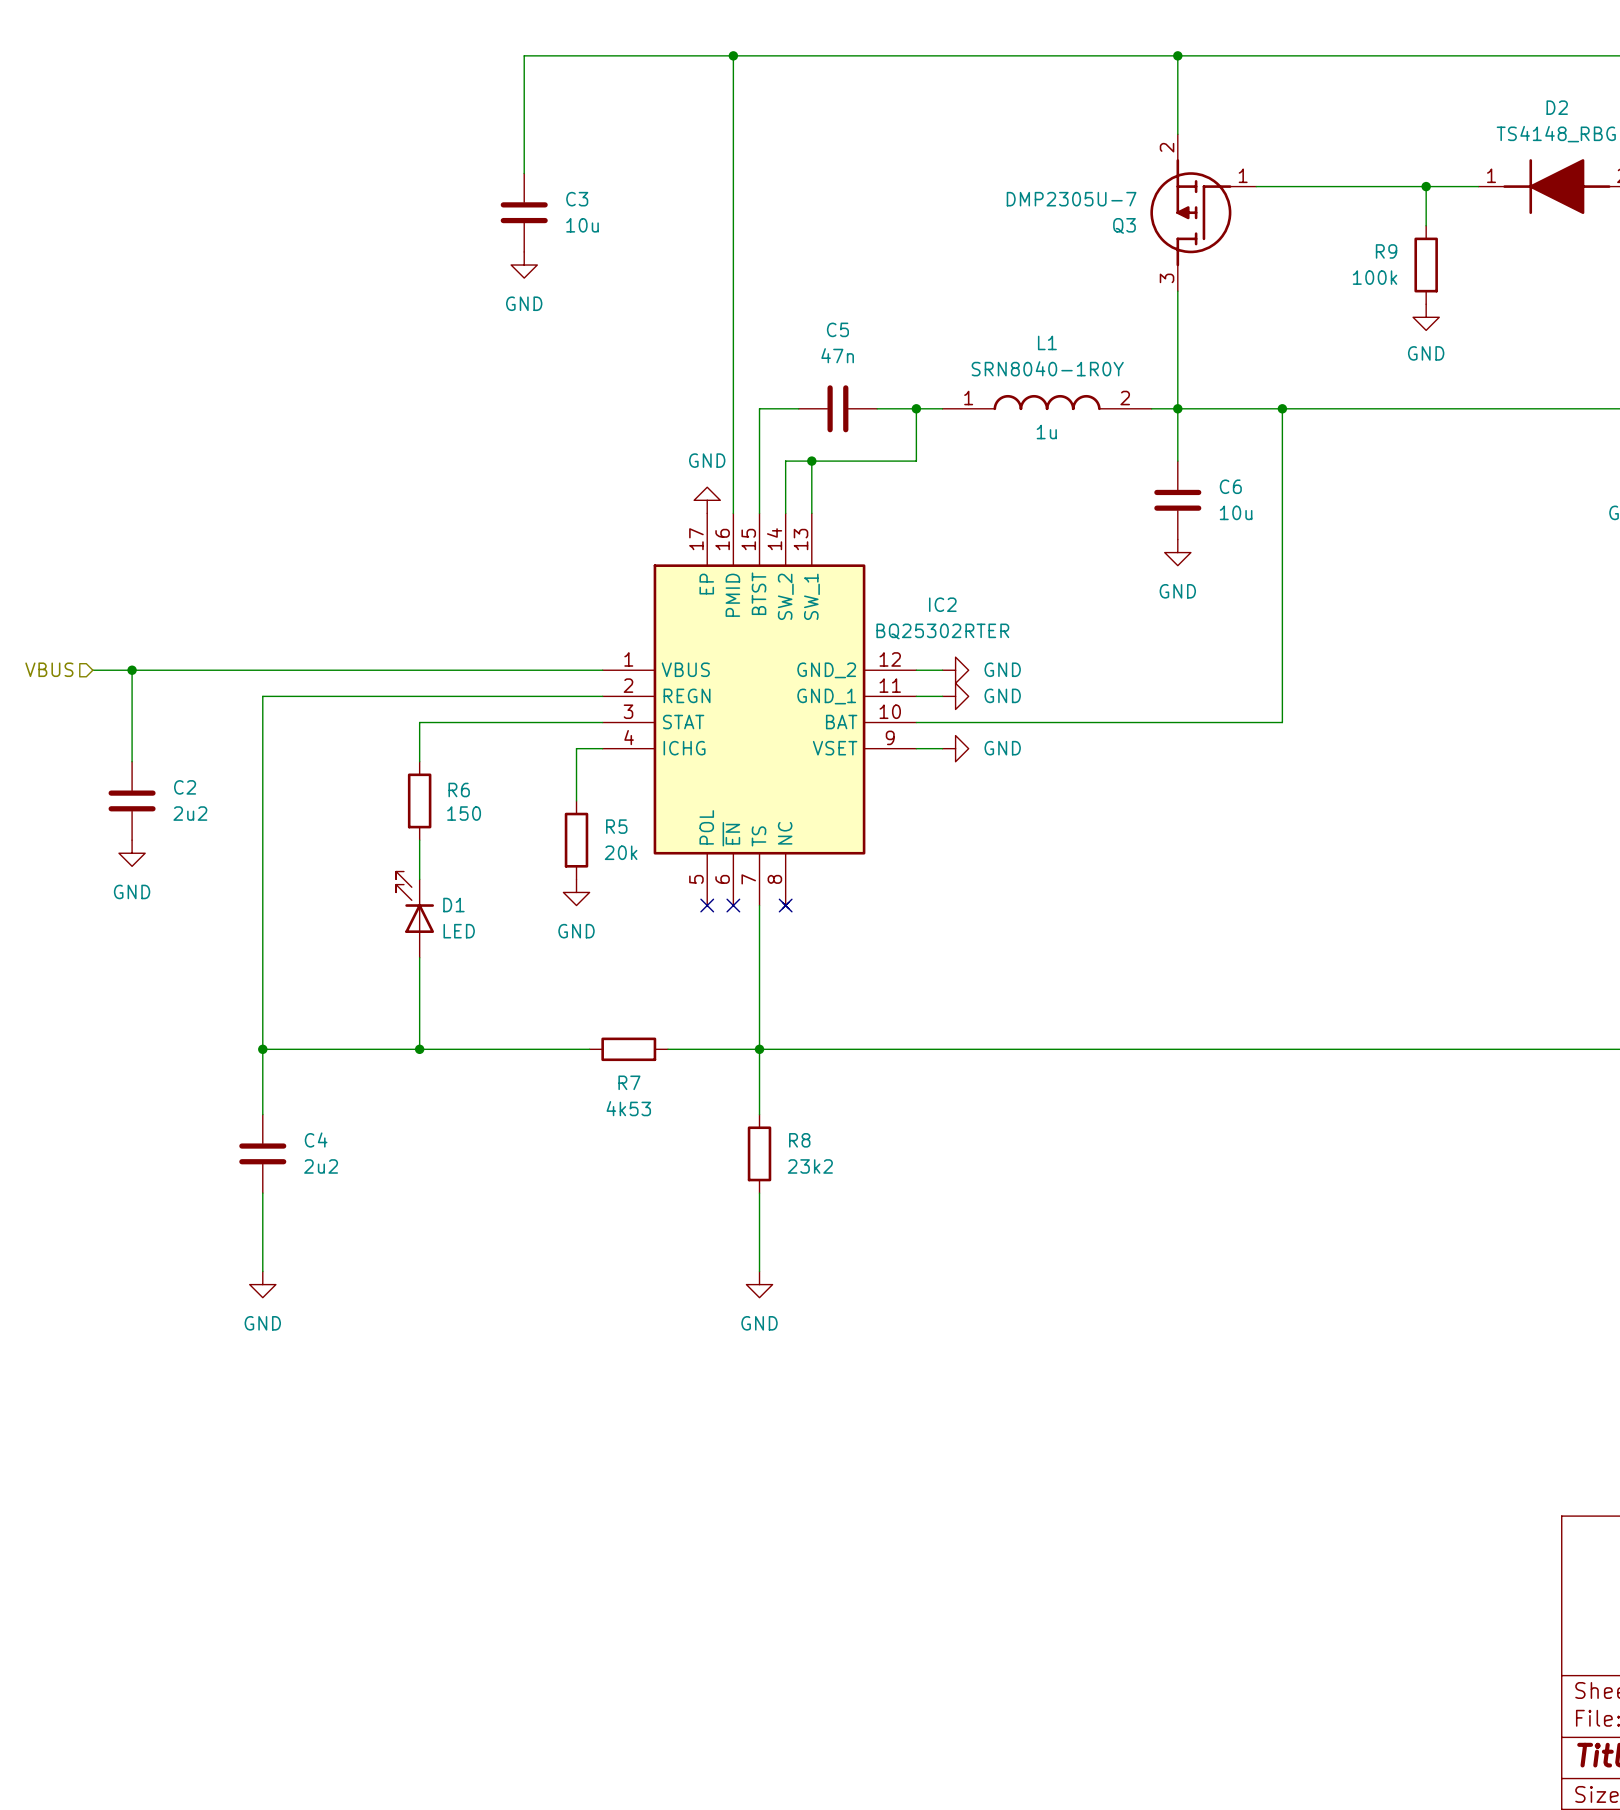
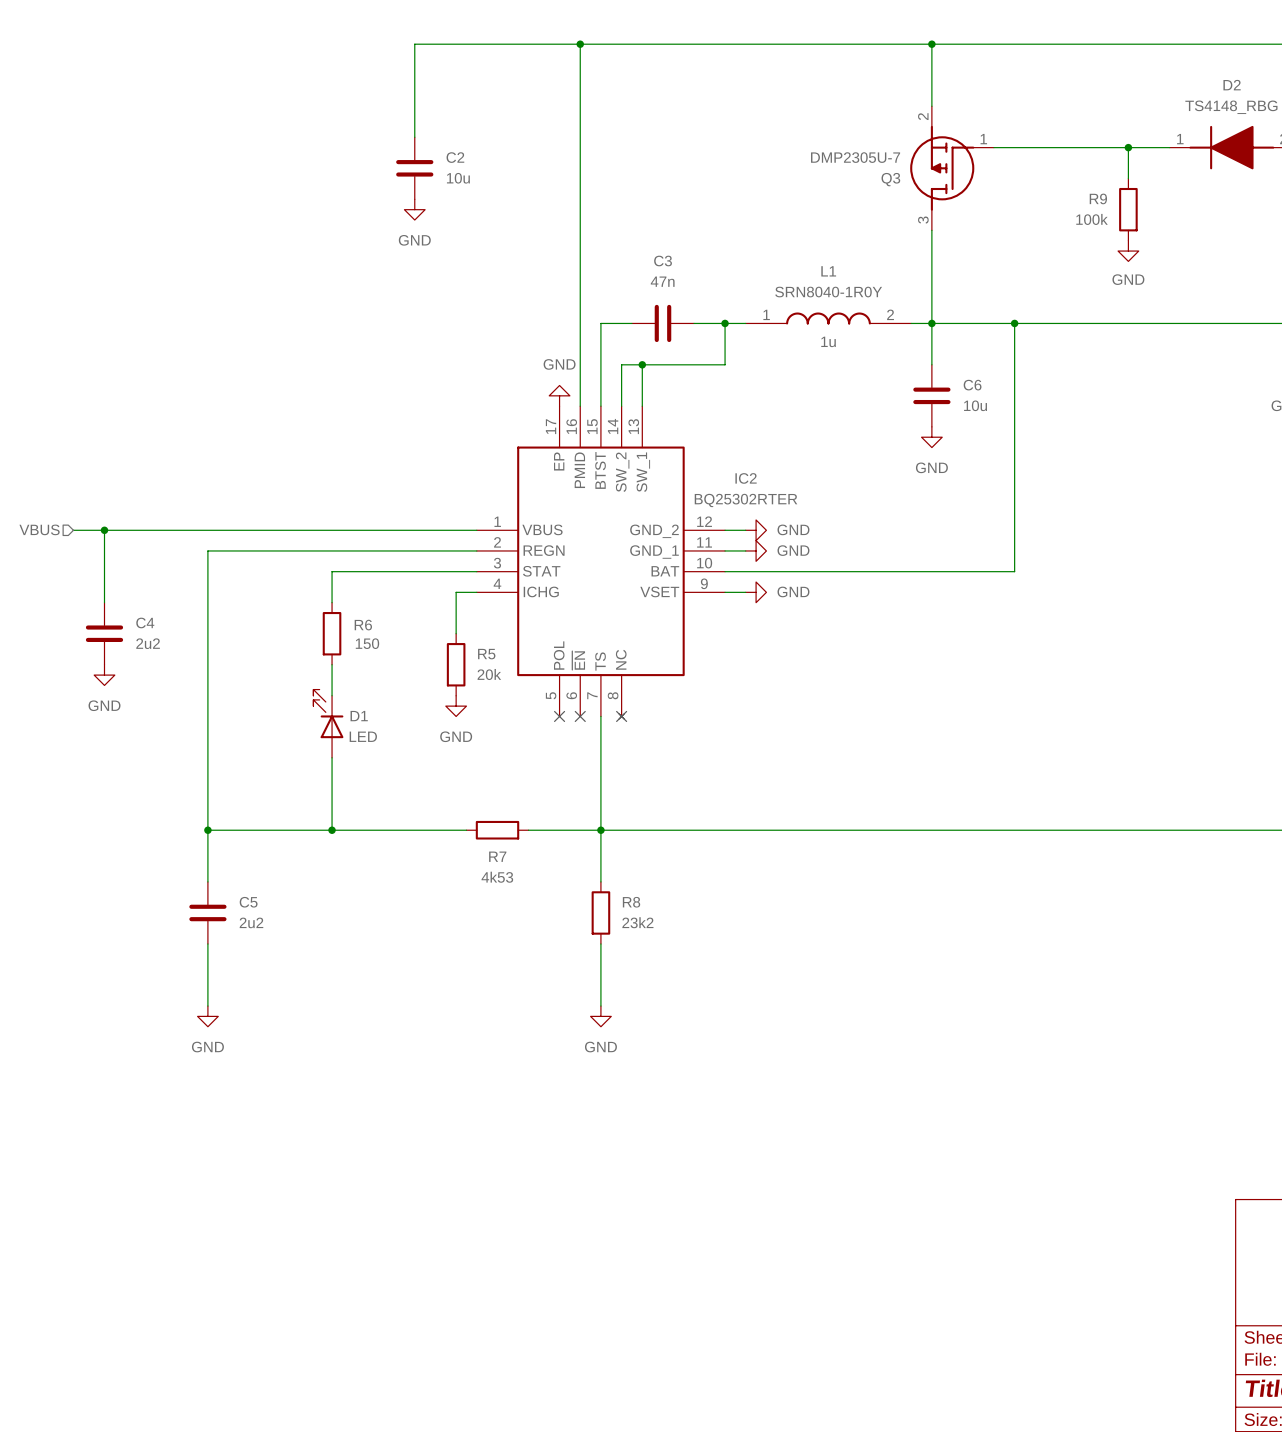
C3 name: C3 (577, 199) -> C2 (455, 157)
C5 name: C5 (837, 329) -> C3 (663, 261)
C2 name: C2 (185, 787) -> C4 (145, 622)
C4 name: C4 (316, 1140) -> C5 (248, 902)

